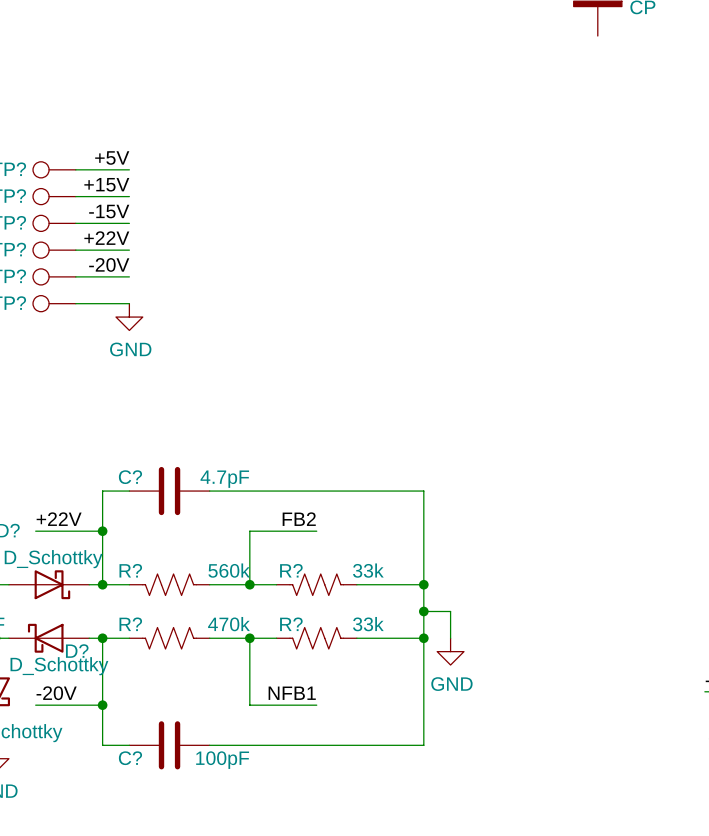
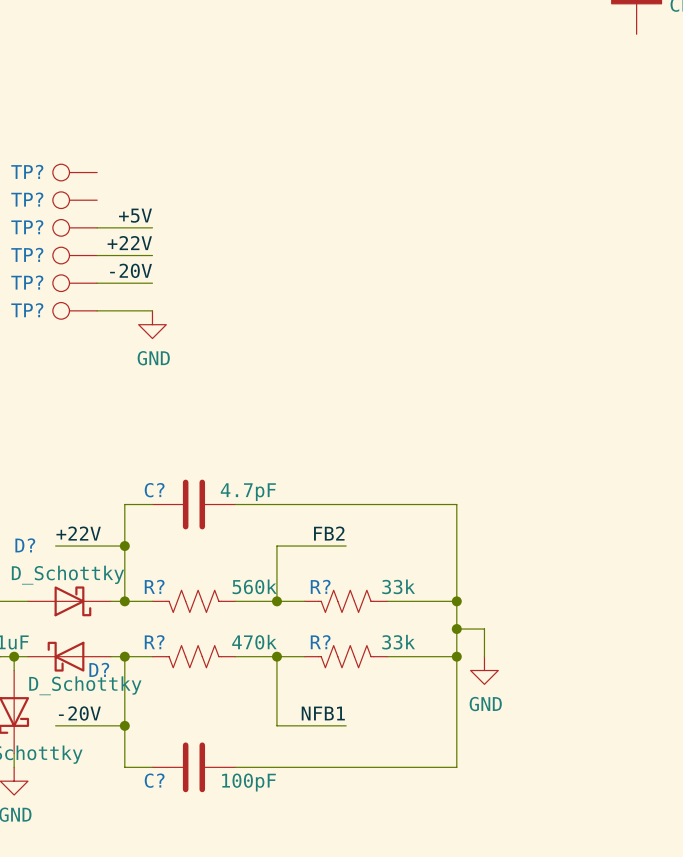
label: +5V (112, 157) -> none
wire: (75, 169) (129, 169) -> none
label: +15V (106, 184) -> none
wire: (75, 196) (129, 196) -> none
label: -15V (109, 211) -> +5V (135, 215)

